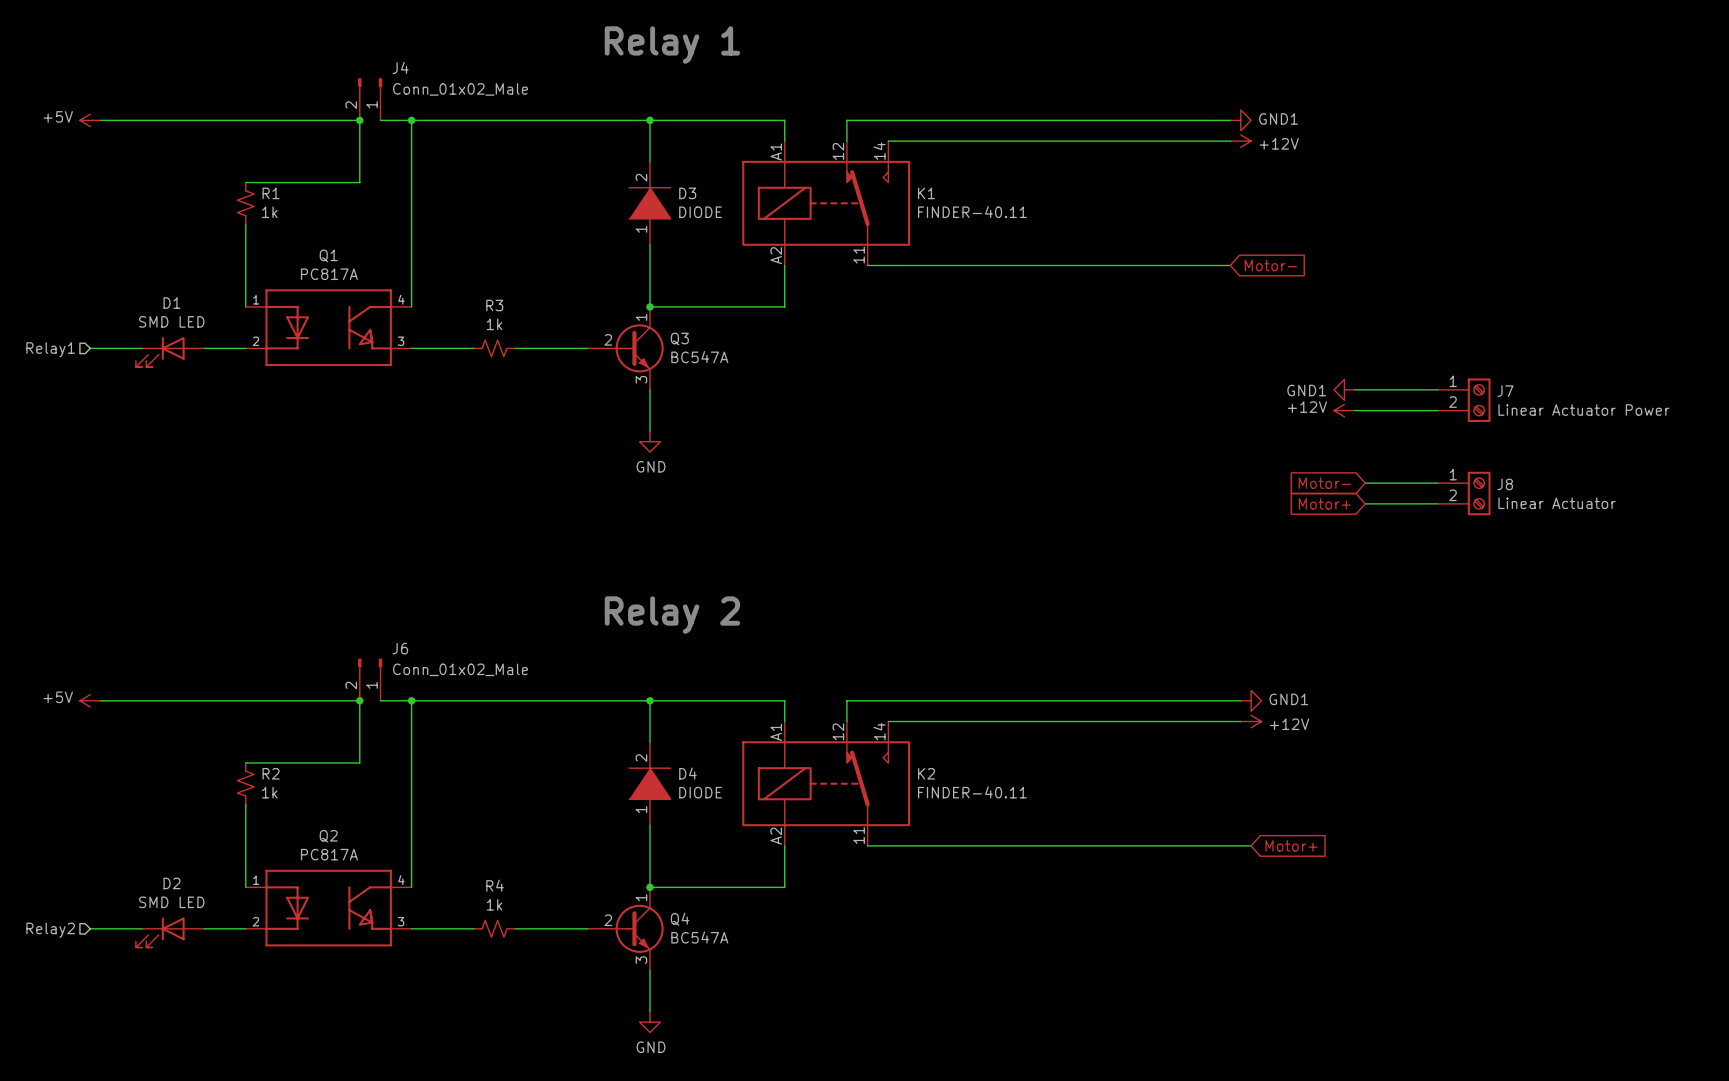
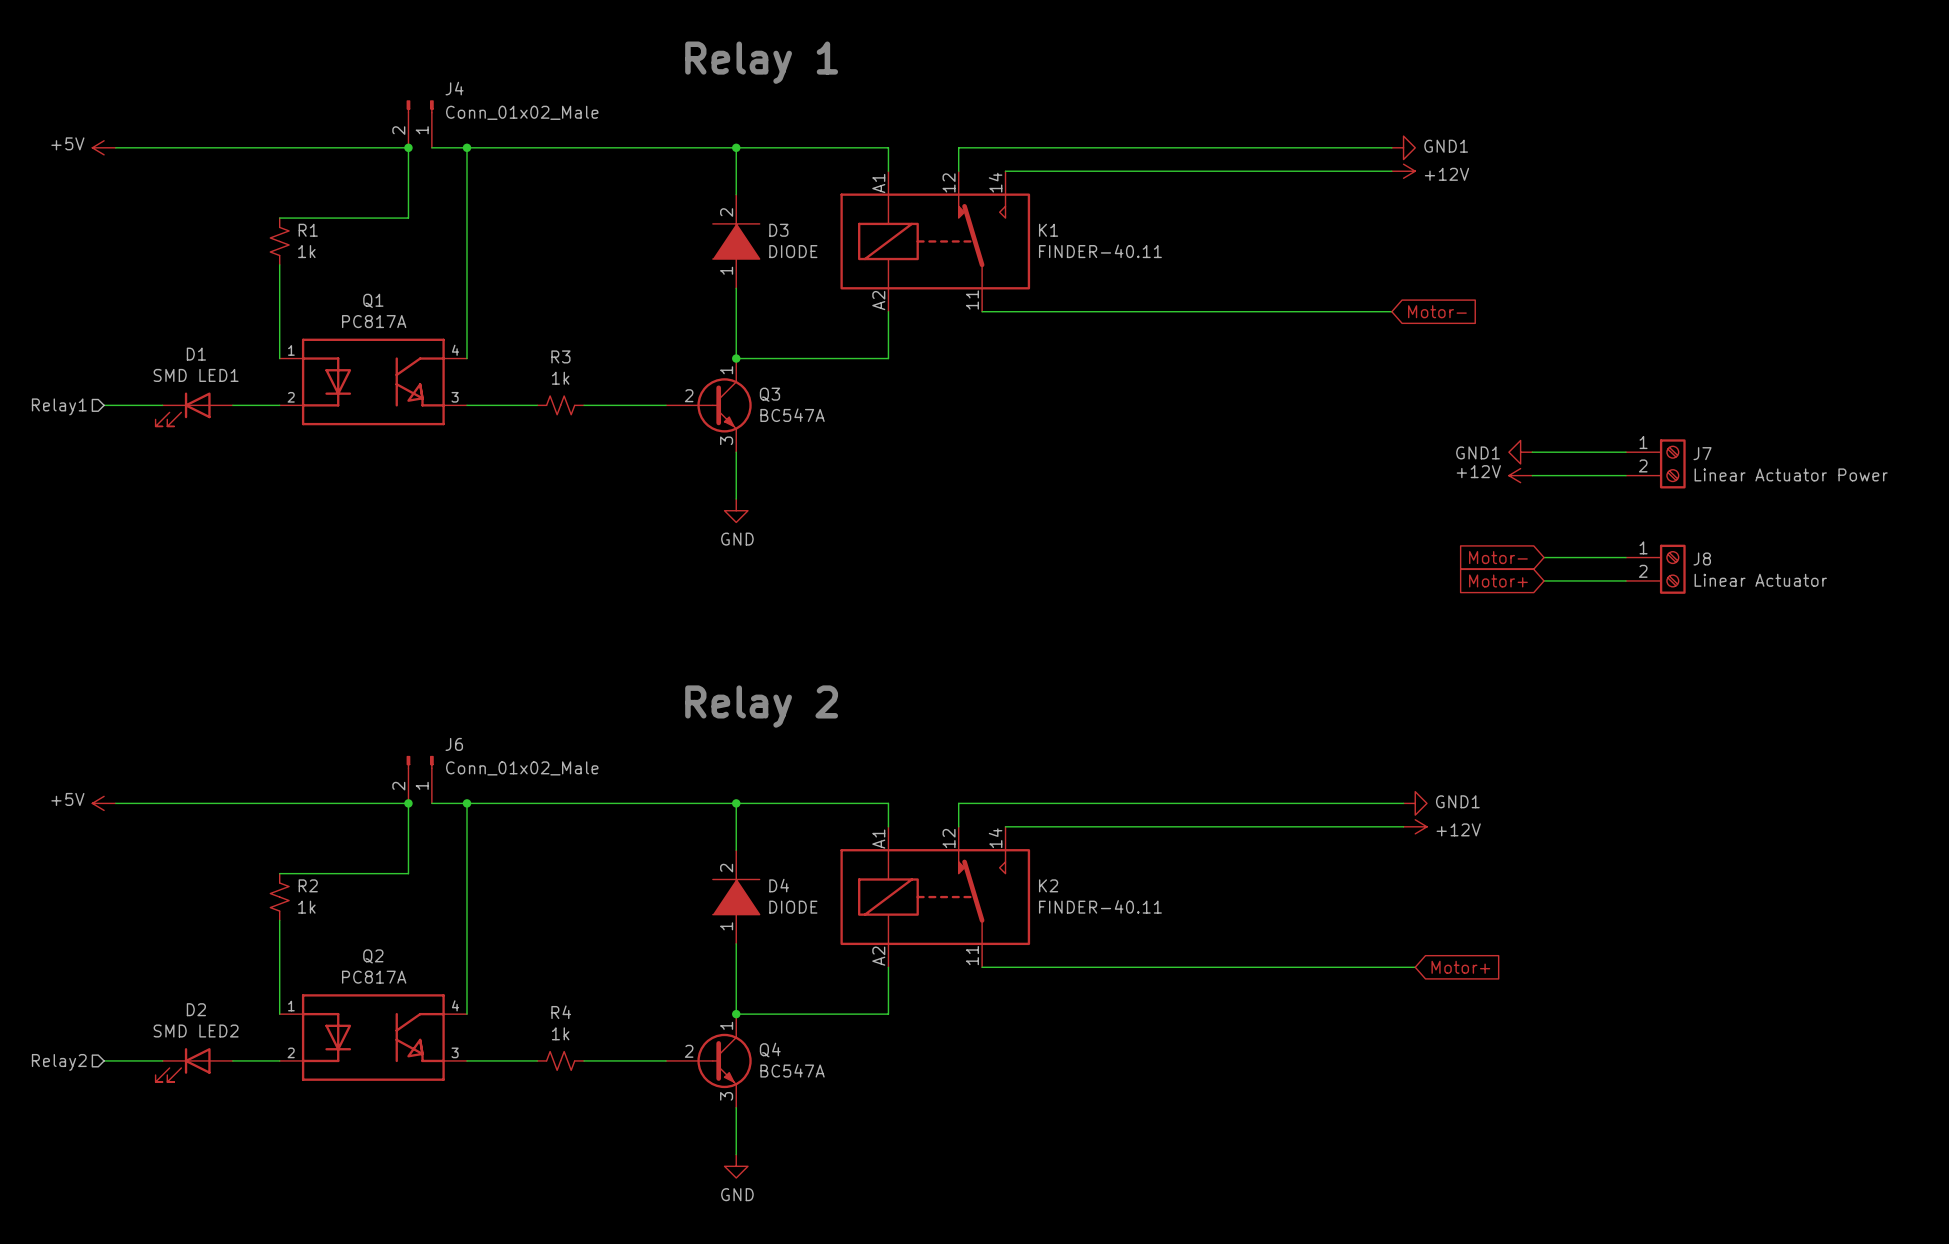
D1 value: SMD LED (171, 321) -> SMD LED1 (196, 375)
D2 value: SMD LED (171, 902) -> SMD LED2 (196, 1031)

